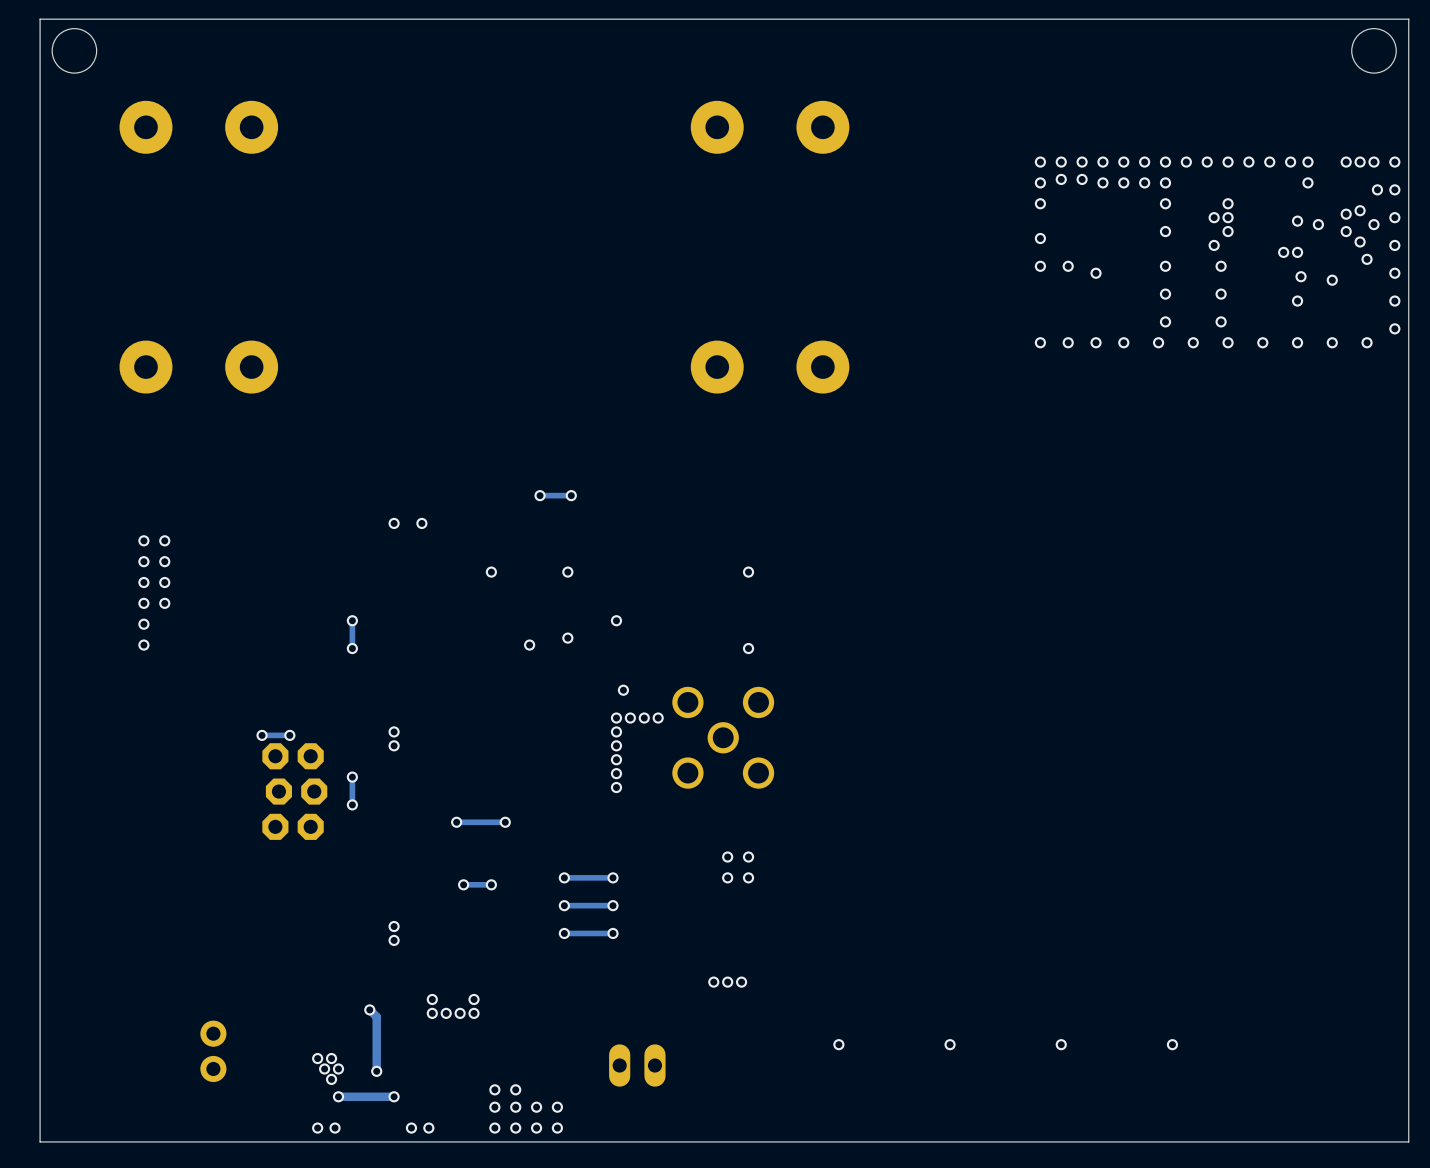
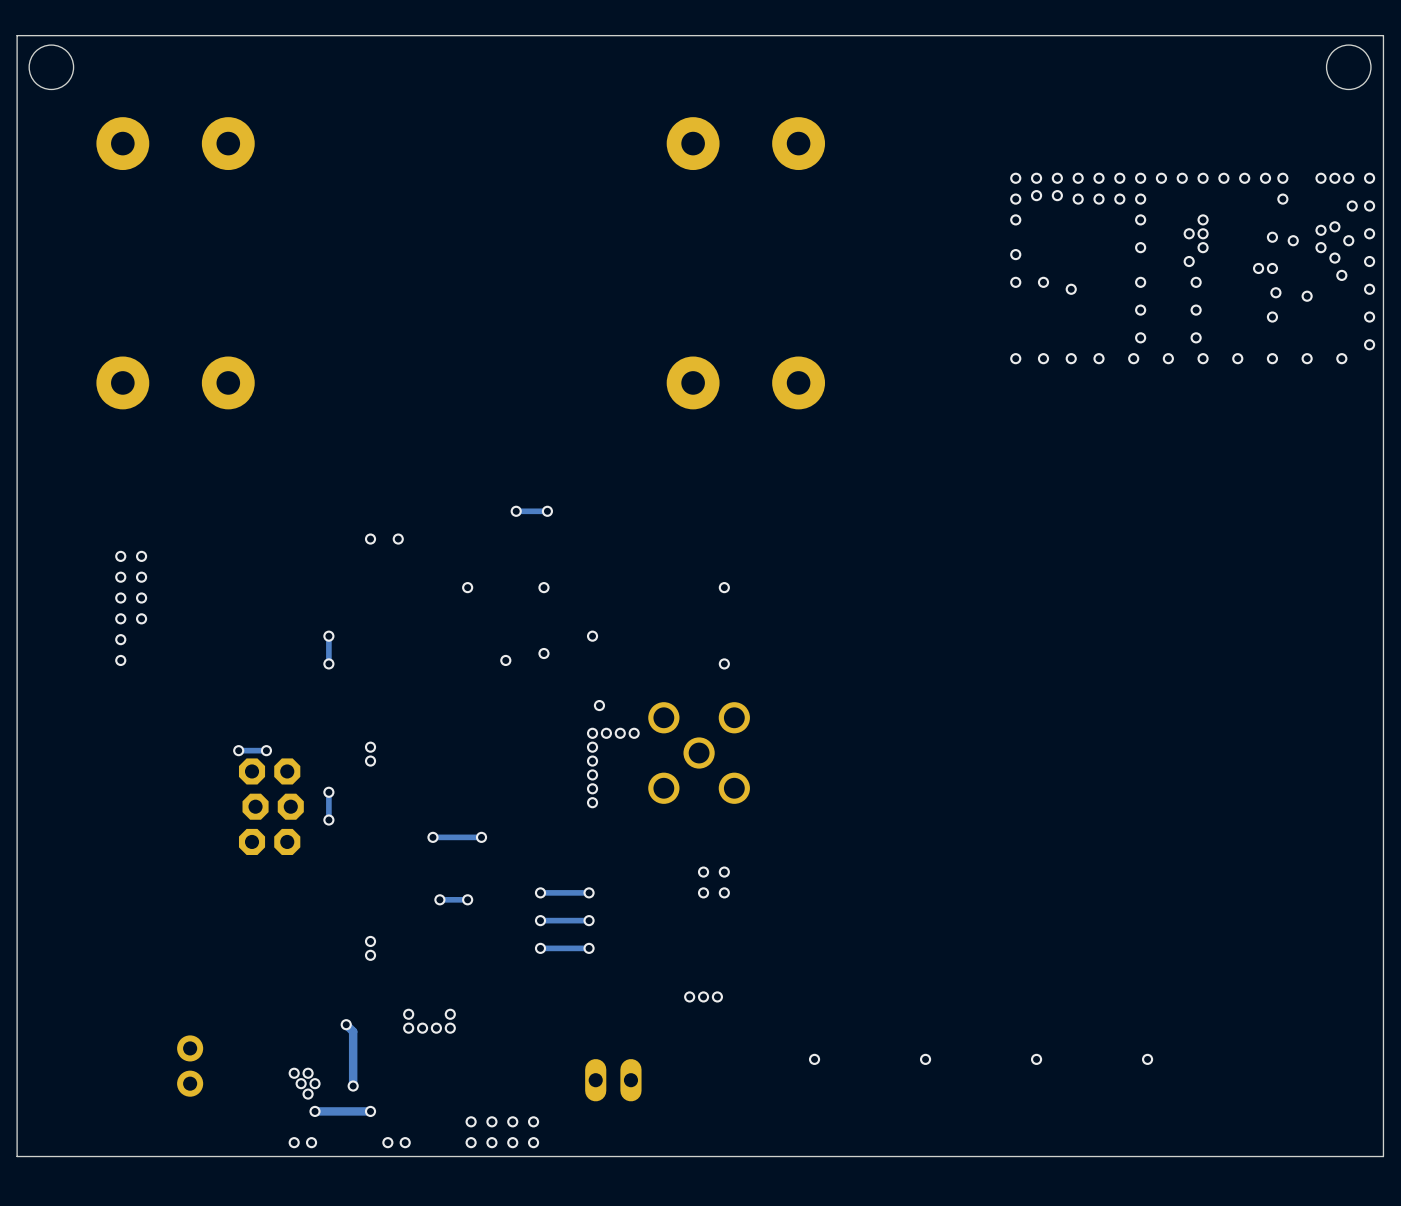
via: (494, 1089) -> none
via: (515, 1089) -> none

